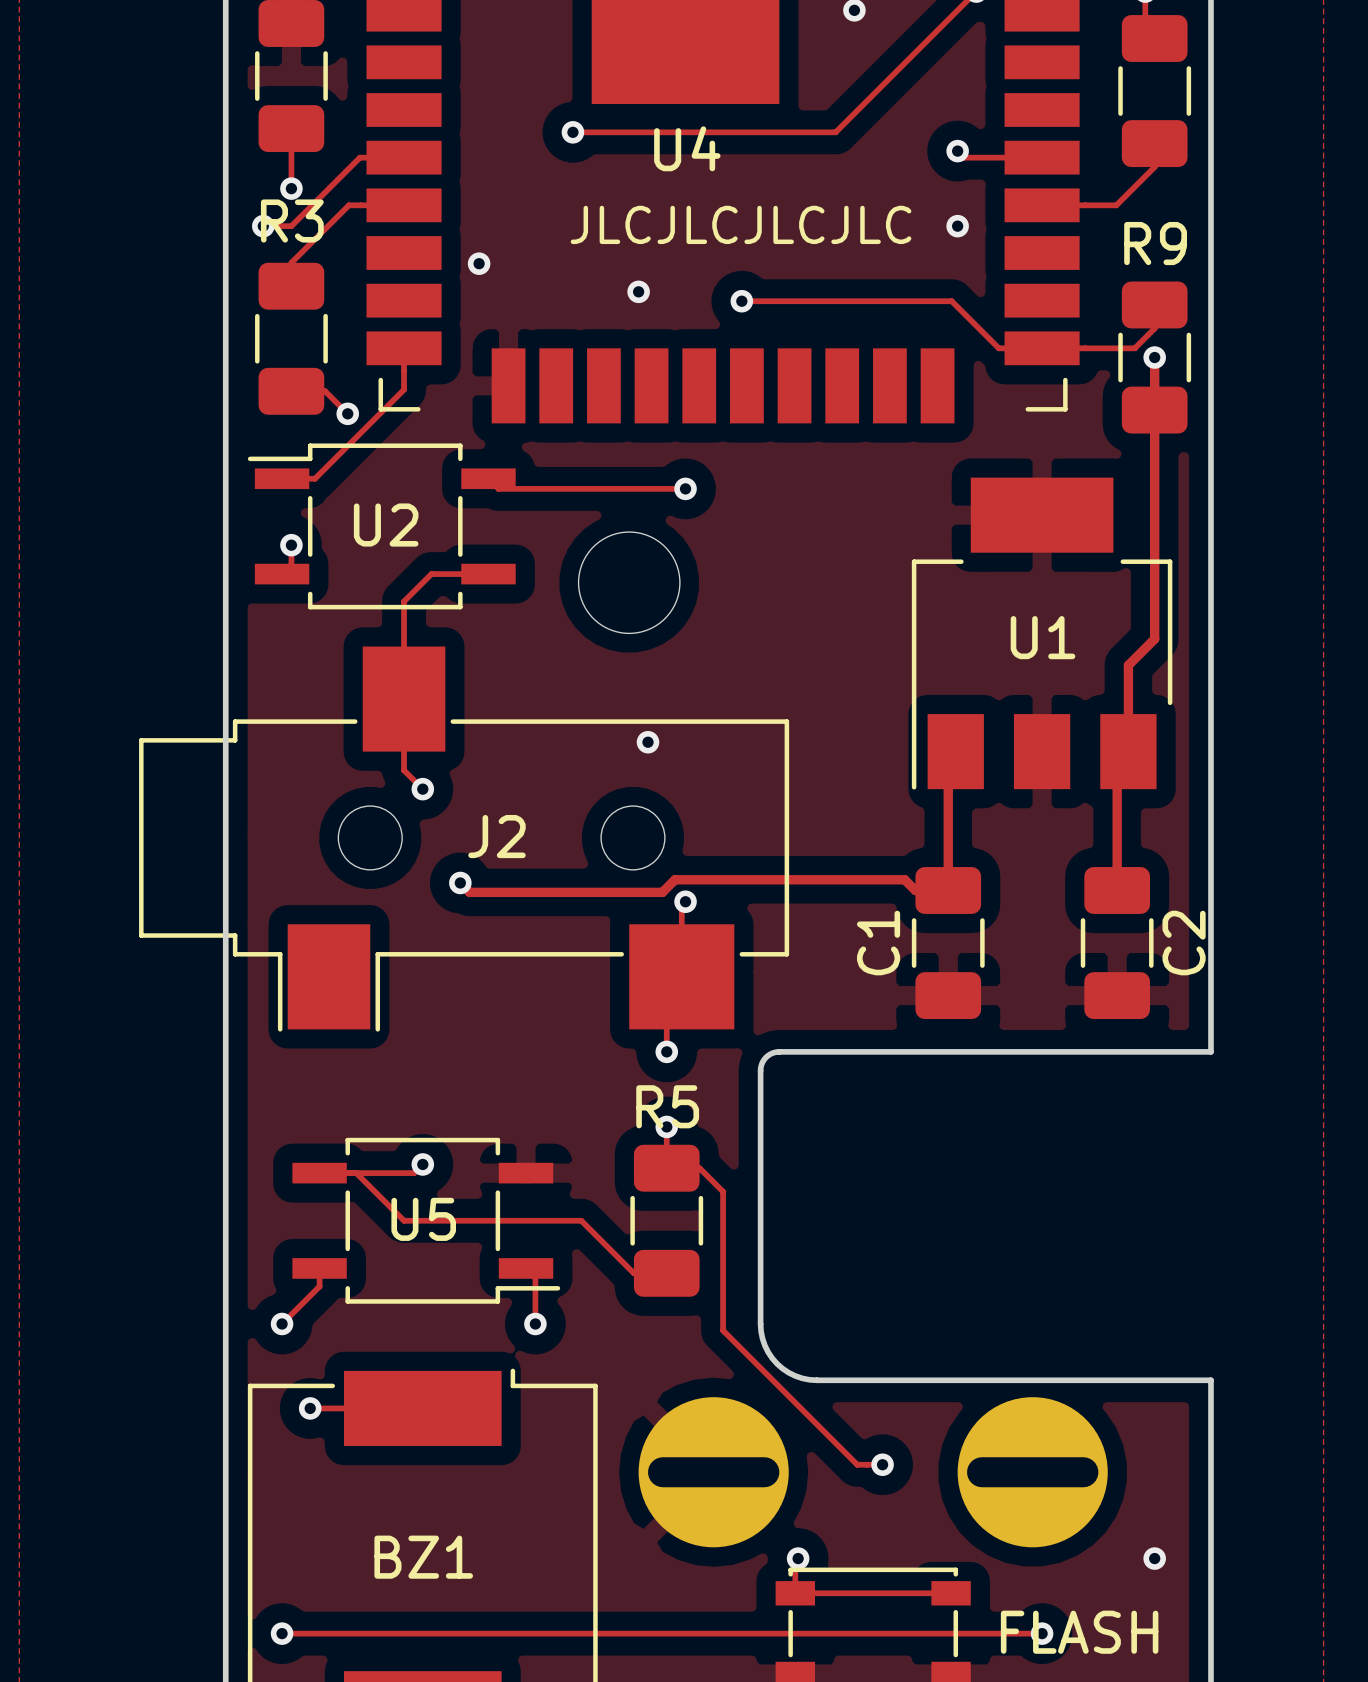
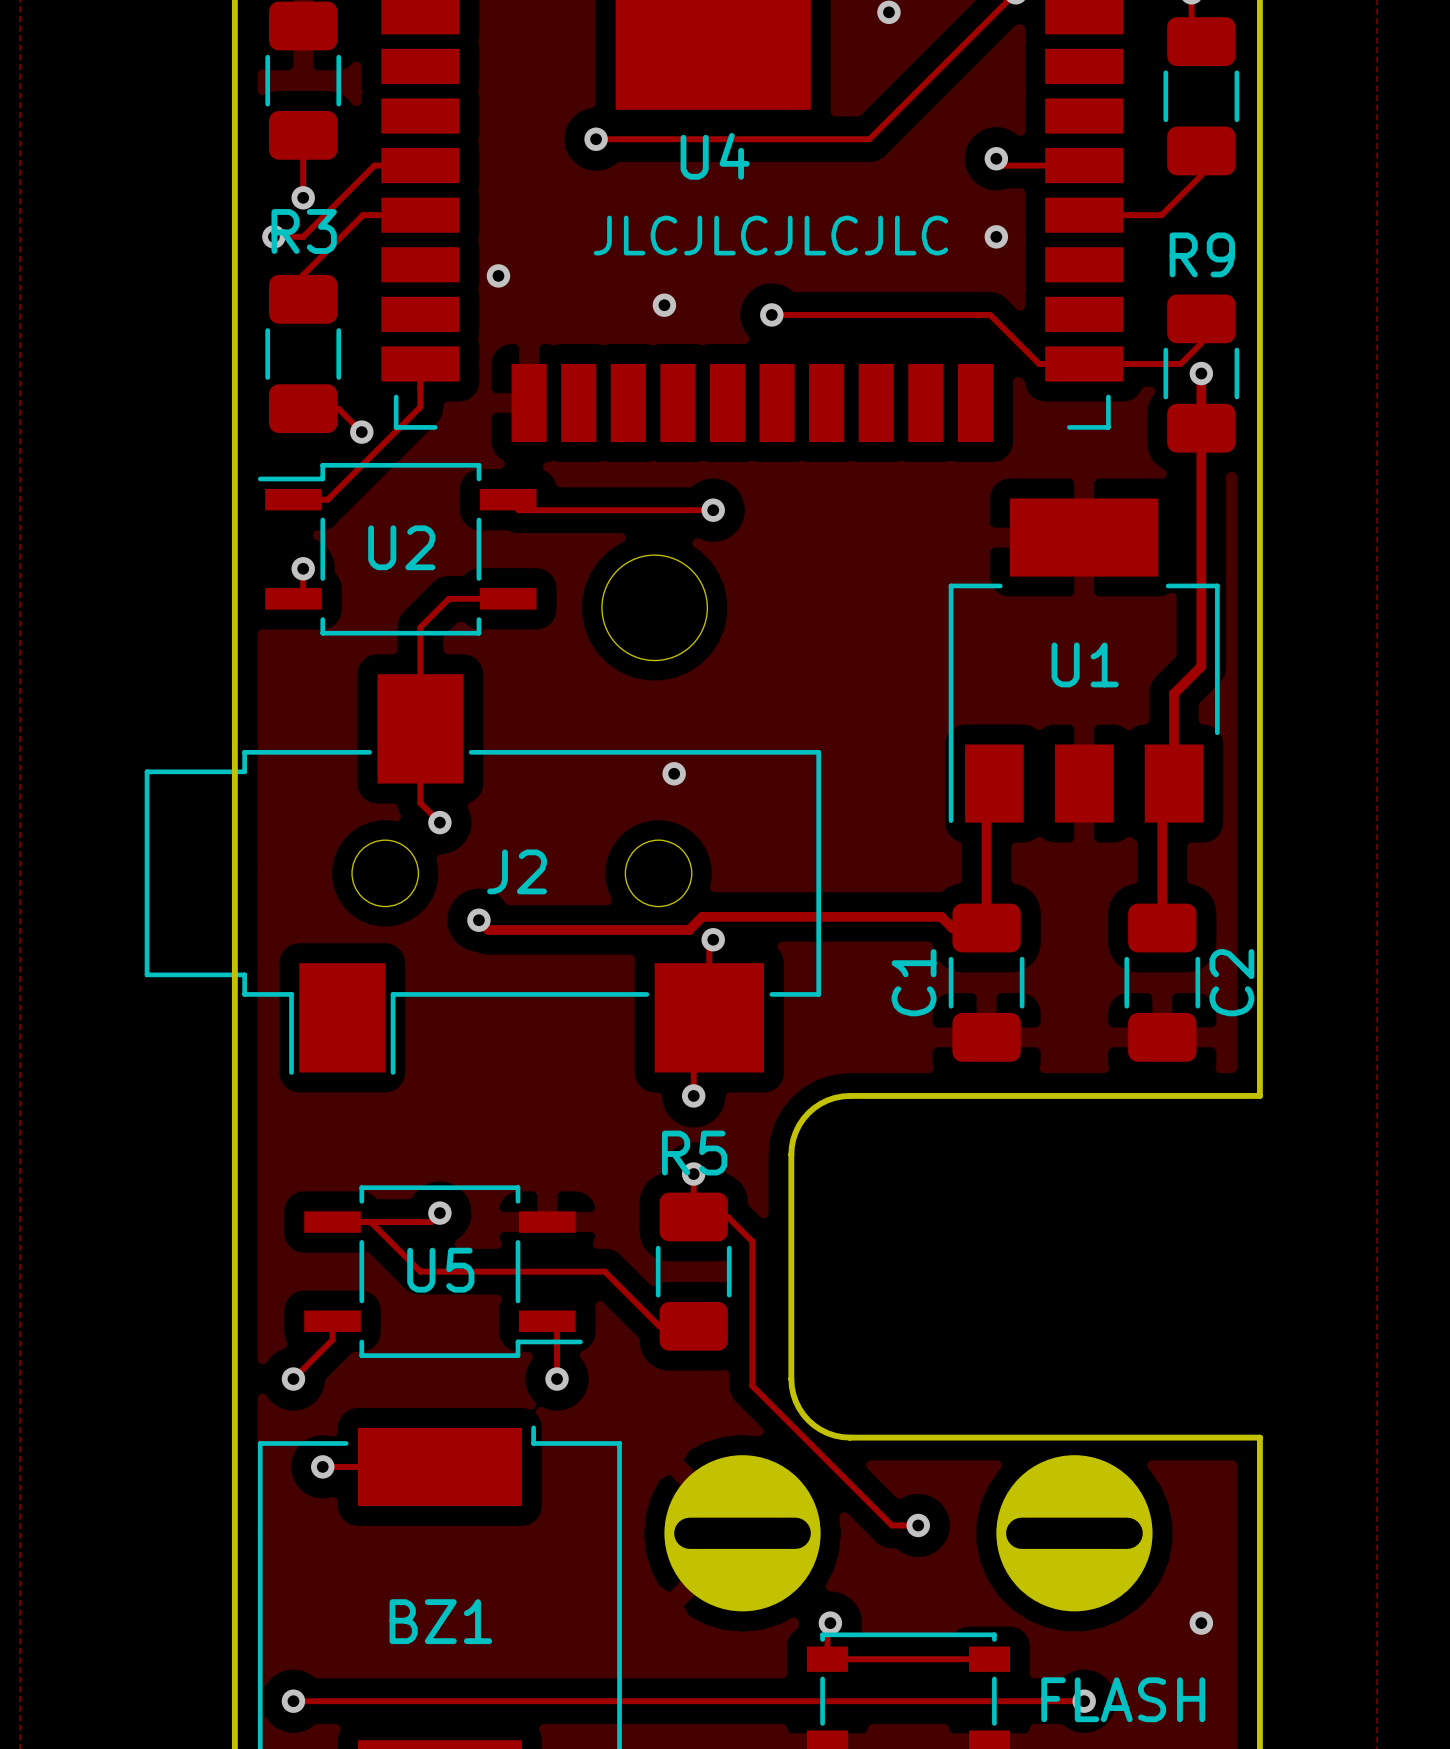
board edge: (816, 1051) (776, 1052) (766, 1057) (760, 1068) (760, 1108) -> (849, 1095) (827, 1100) (808, 1113) (795, 1132) (791, 1154)

